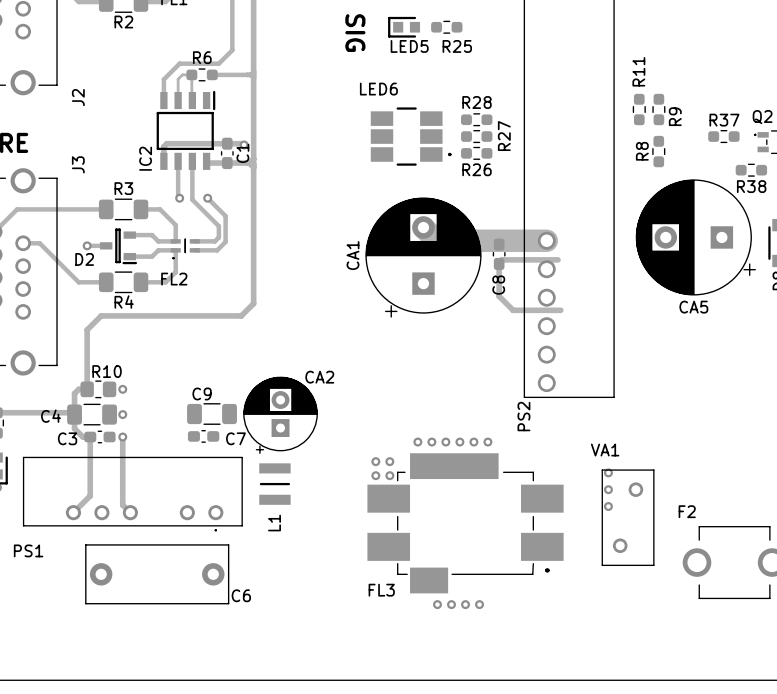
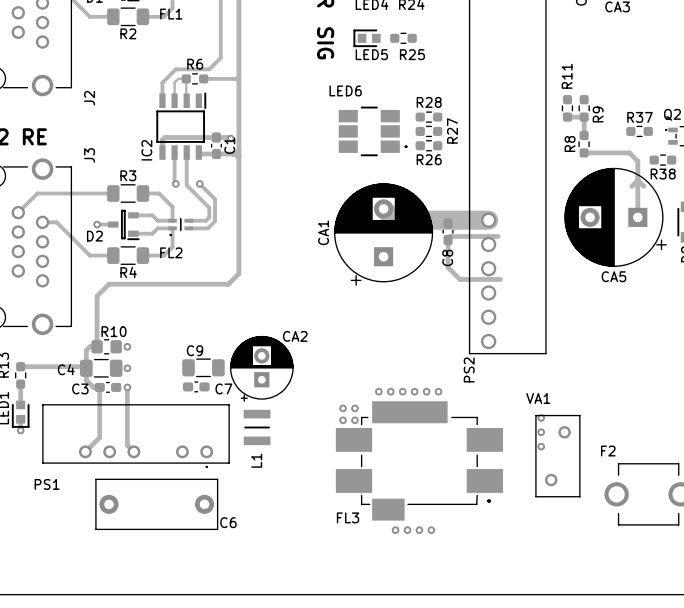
track: none -> (567, 117) (584, 117) (584, 135)
track: none -> (584, 152) (629, 152) (637, 161) (637, 217)
track: none -> (637, 180) (631, 186)
track: none -> (637, 180) (643, 186)

